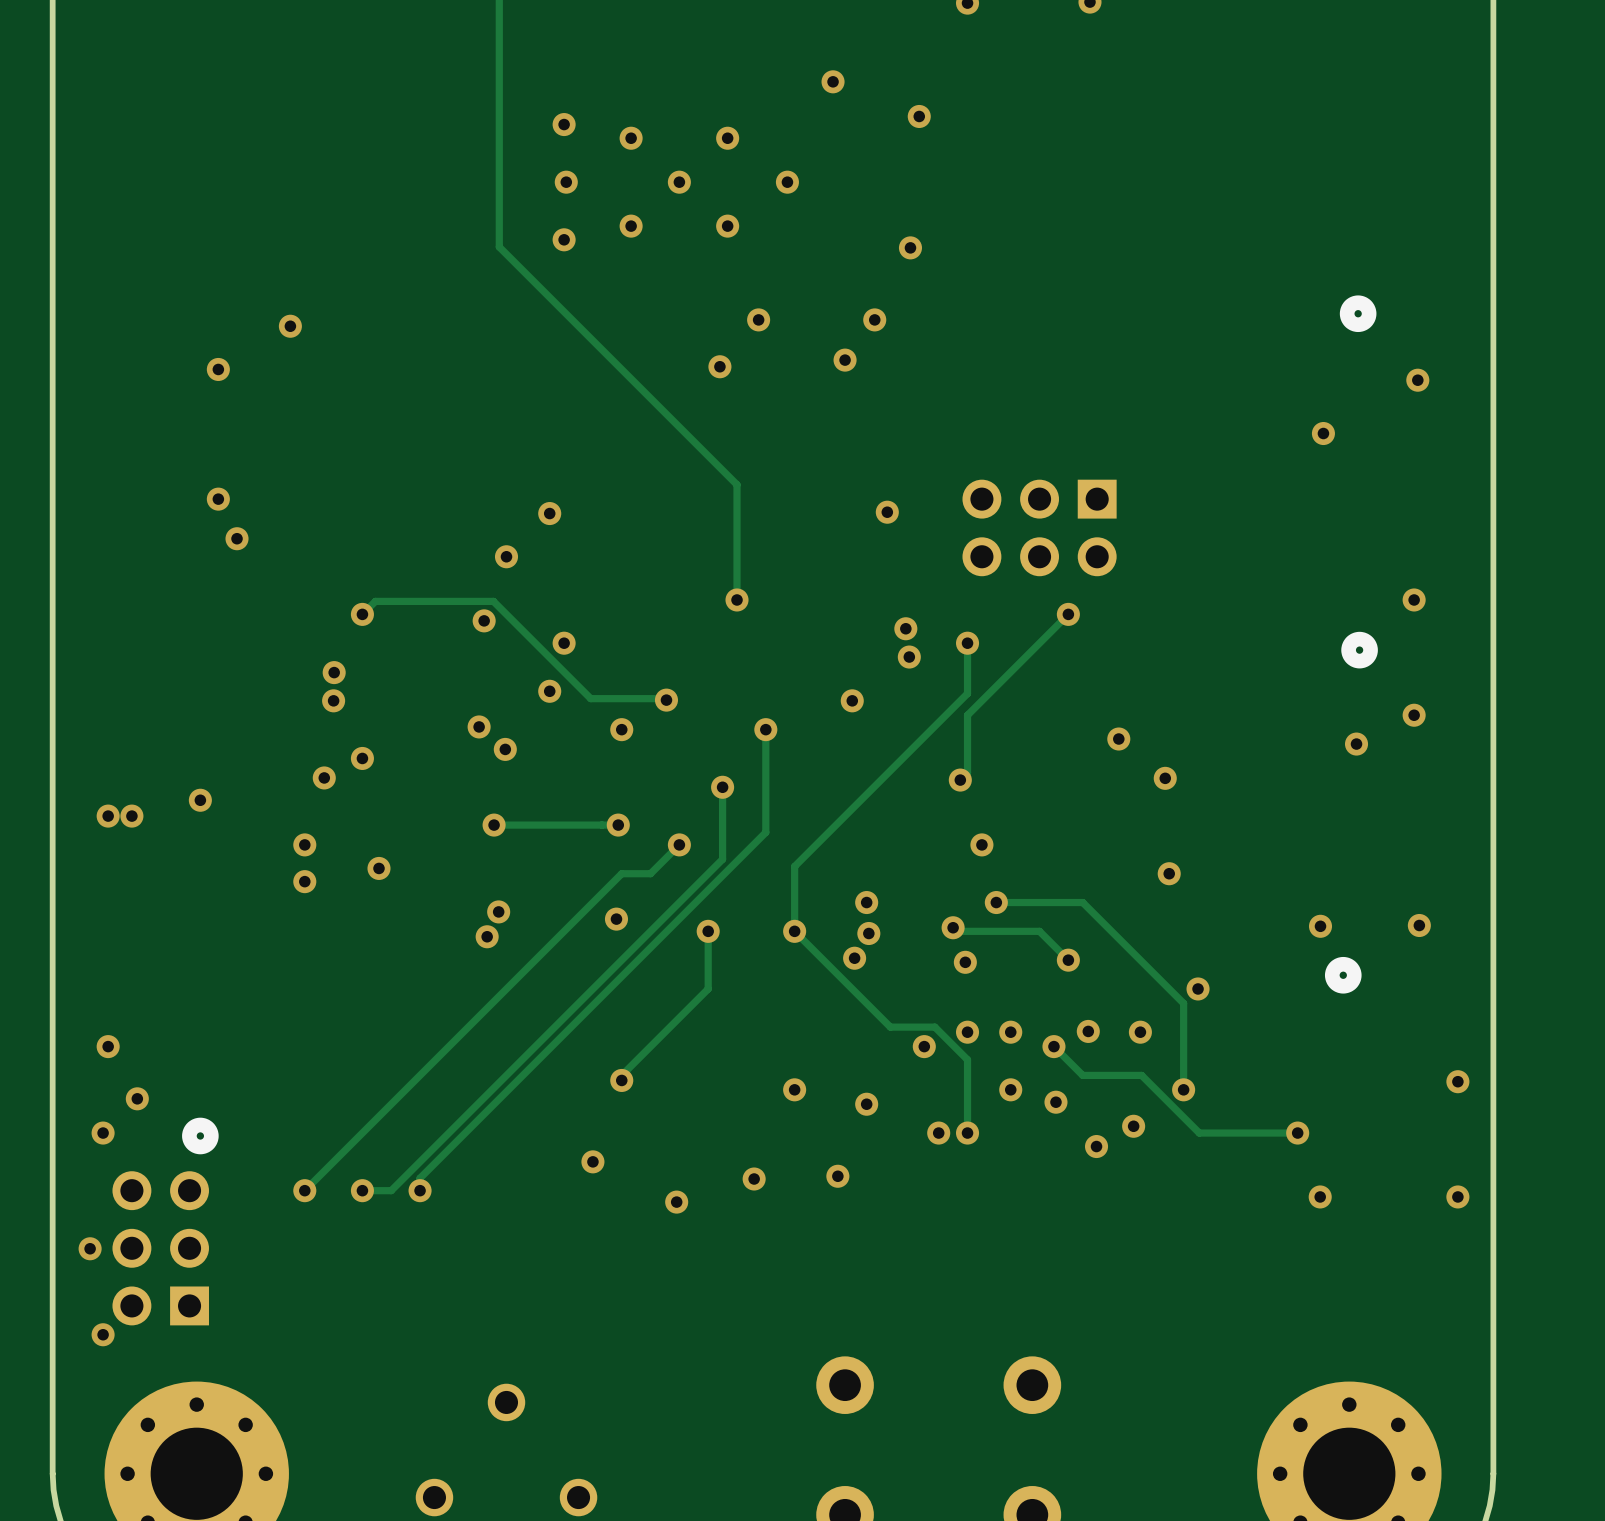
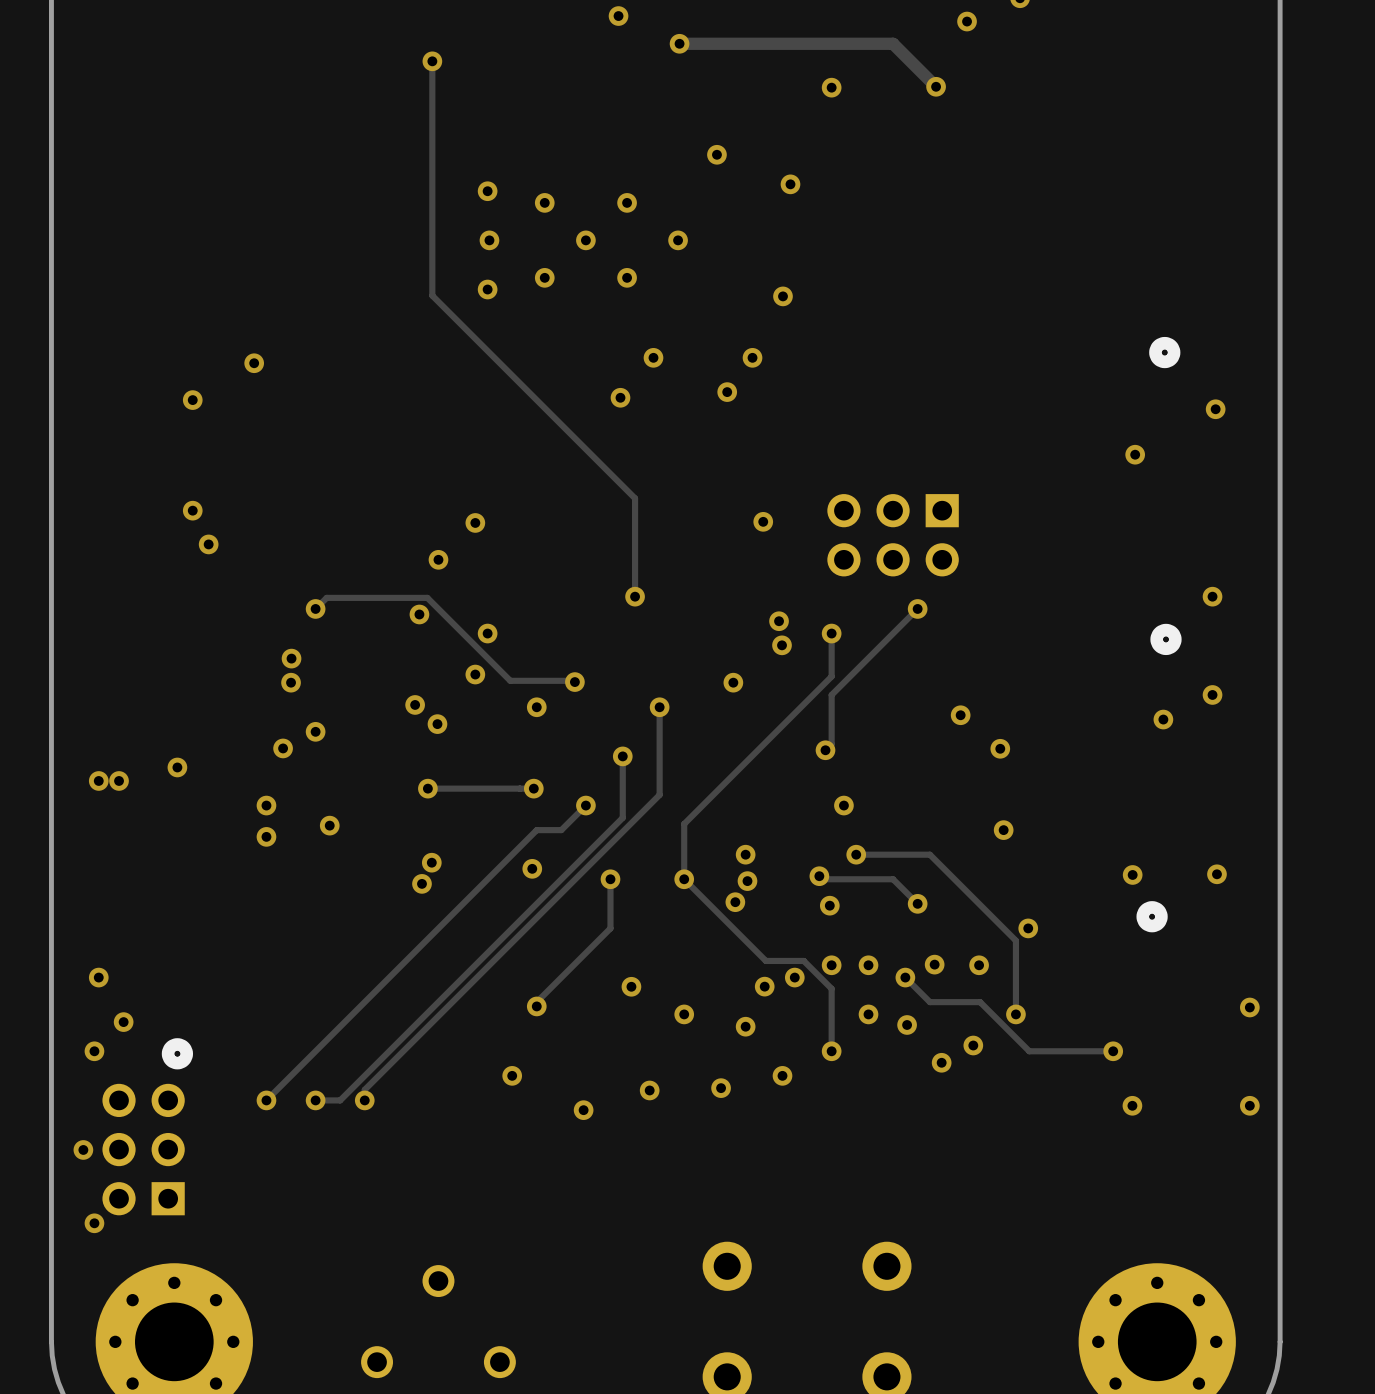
via: none -> (631, 986)
via: none -> (764, 986)
via position: (938, 1133) -> (782, 1075)

